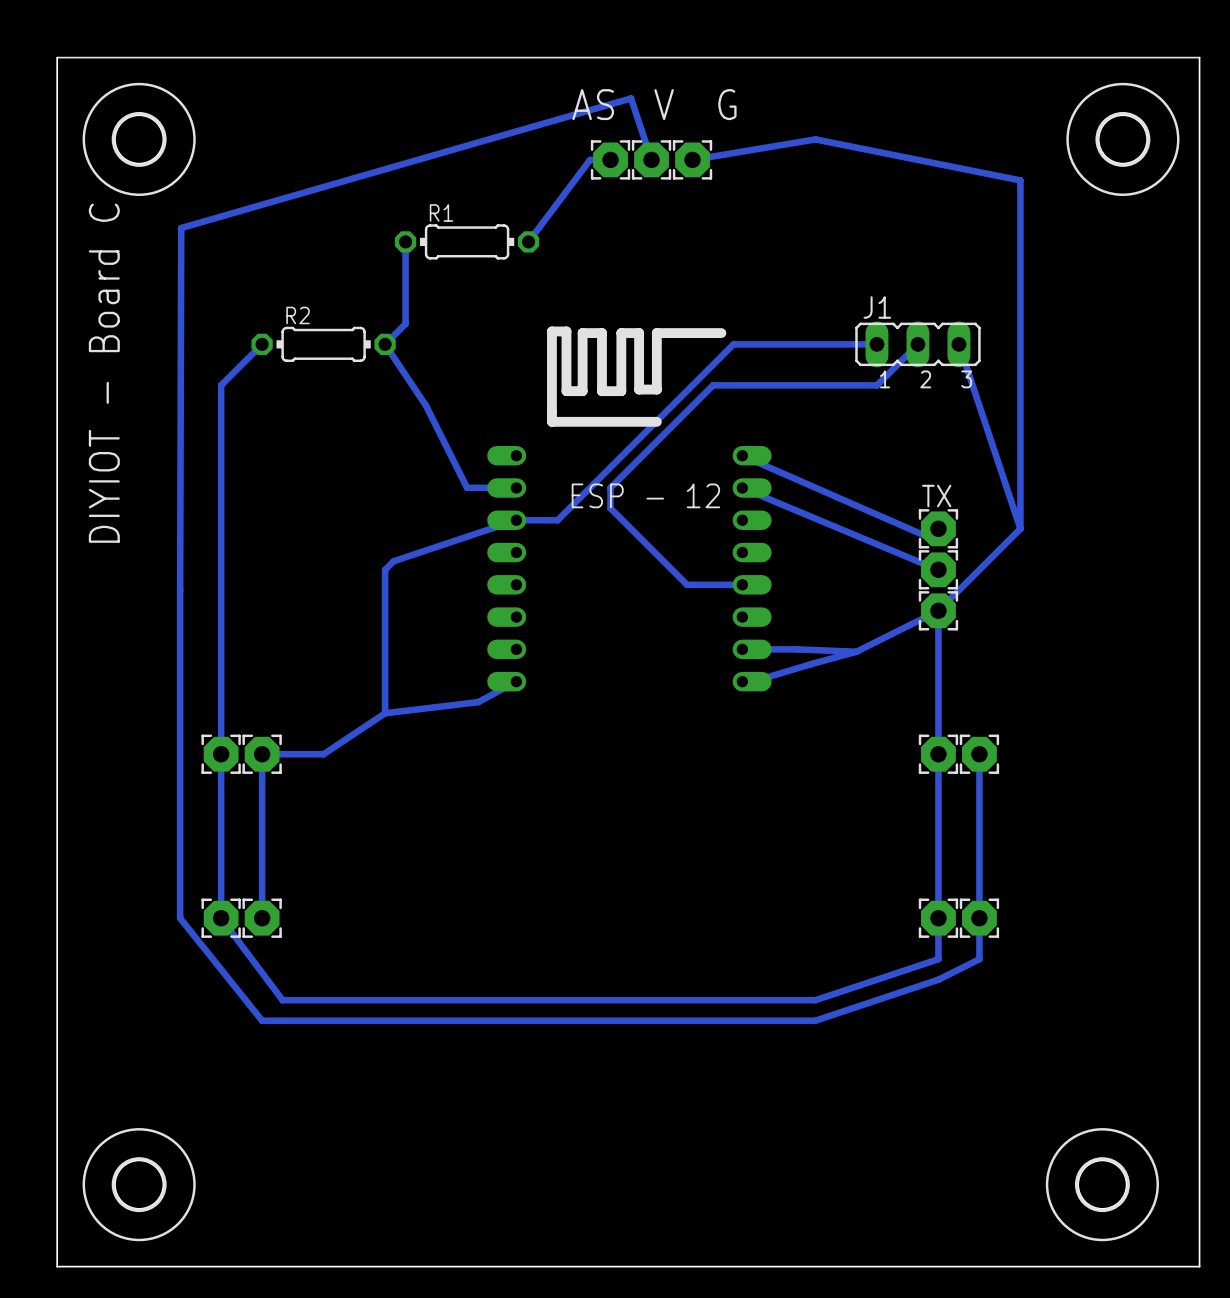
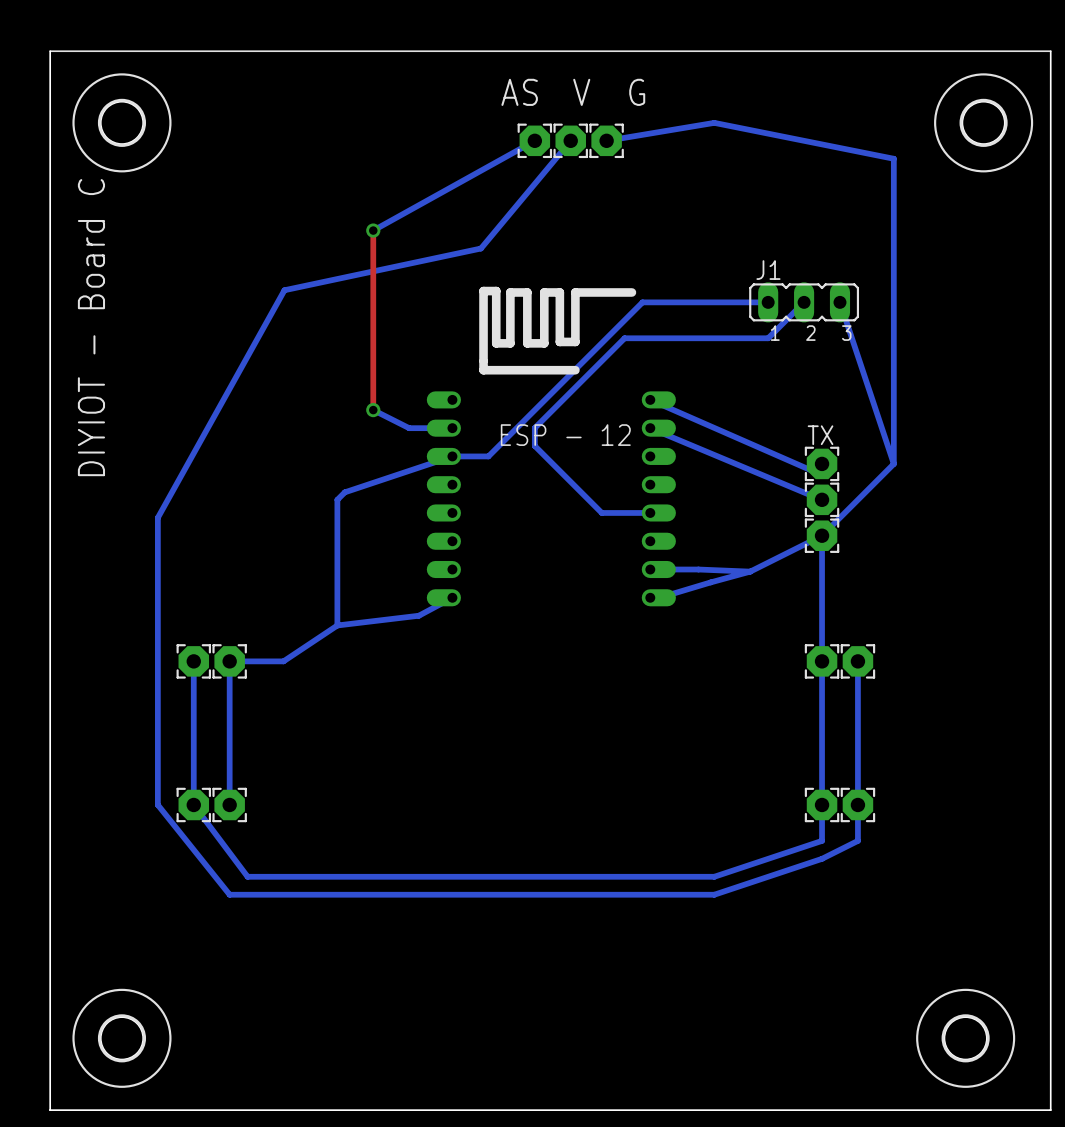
bottom track: (610, 159) (590, 159) (528, 241) -> (534, 140) (373, 230)
bottom track: (651, 159) (631, 98) (181, 228) (180, 590) -> (570, 140) (480, 248) (284, 290) (157, 517)
bottom track: (405, 241) (405, 323) (385, 344) (426, 405) (467, 487) (516, 487) -> (373, 410) (409, 428) (452, 428)
R1: (467, 241) -> none
top track: none -> (373, 230) (373, 410)
via: none -> (373, 230)
bottom track: (262, 344) (221, 385) (221, 754) -> none
R2: (323, 344) -> none
via: none -> (373, 410)

